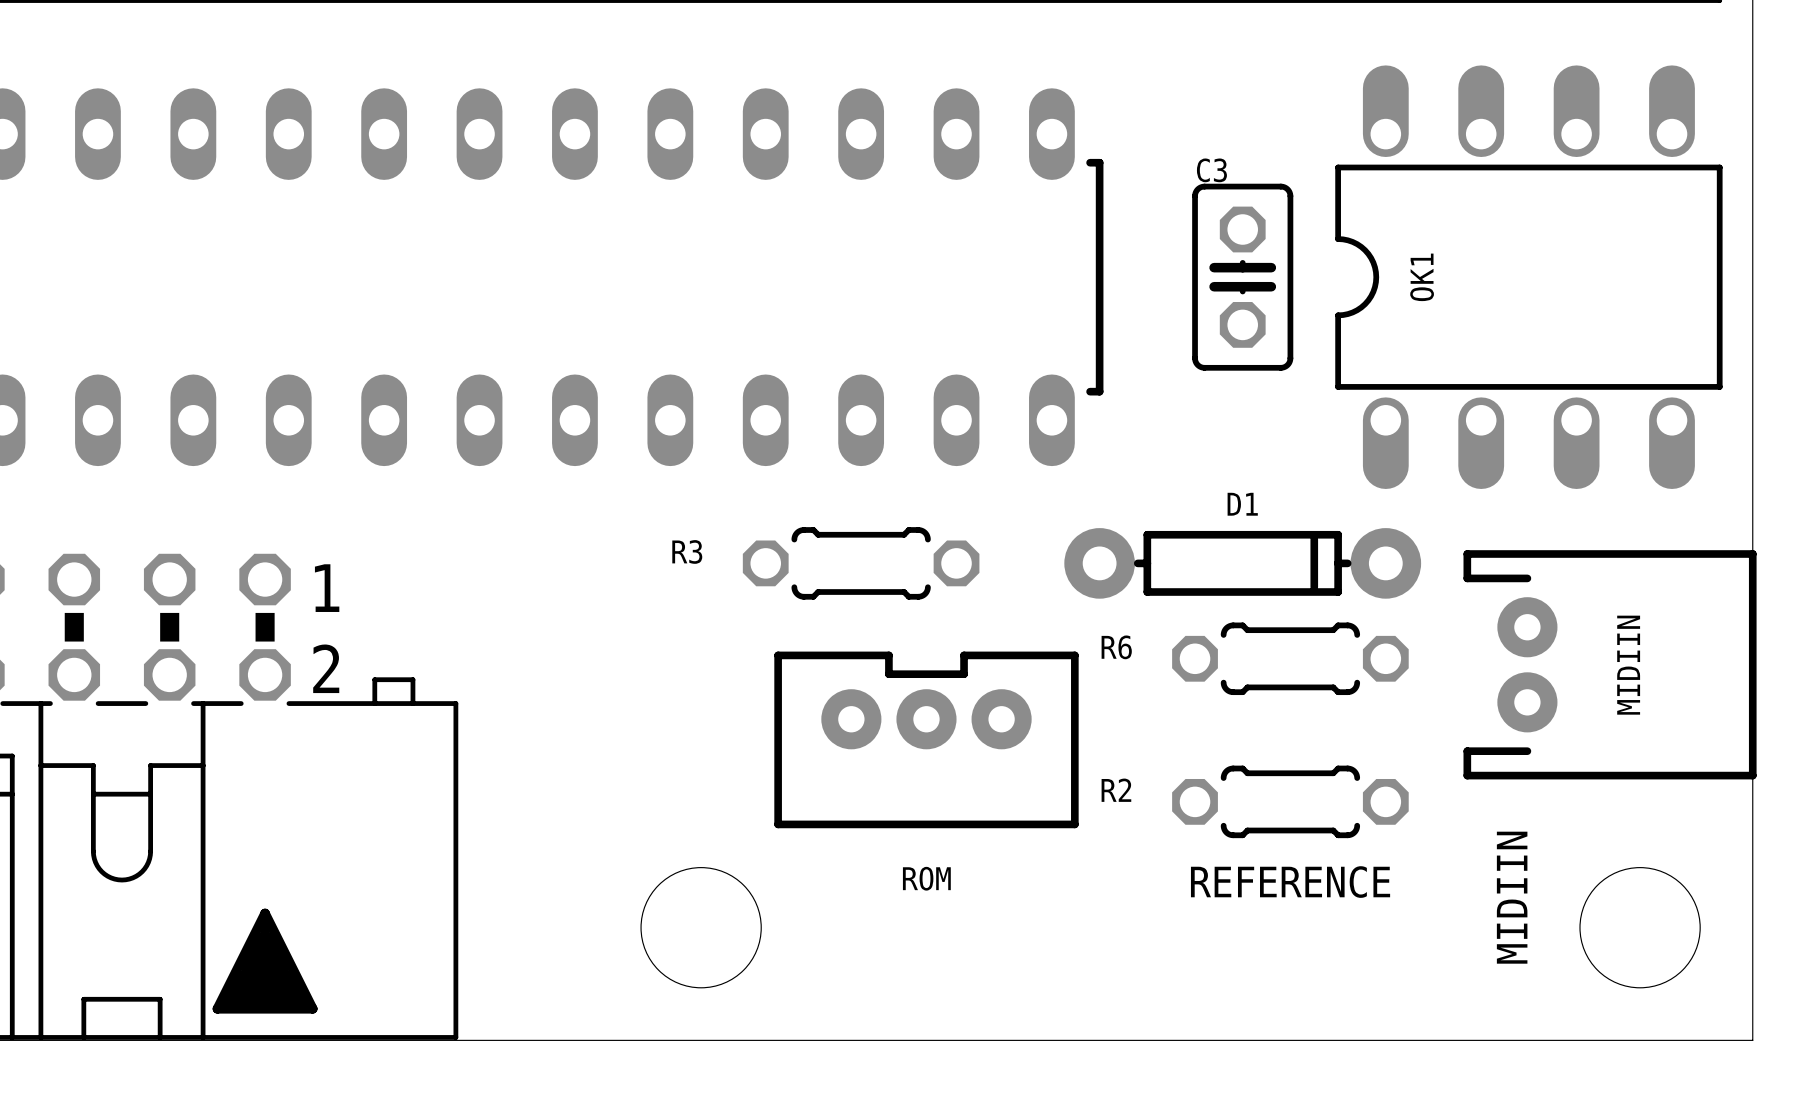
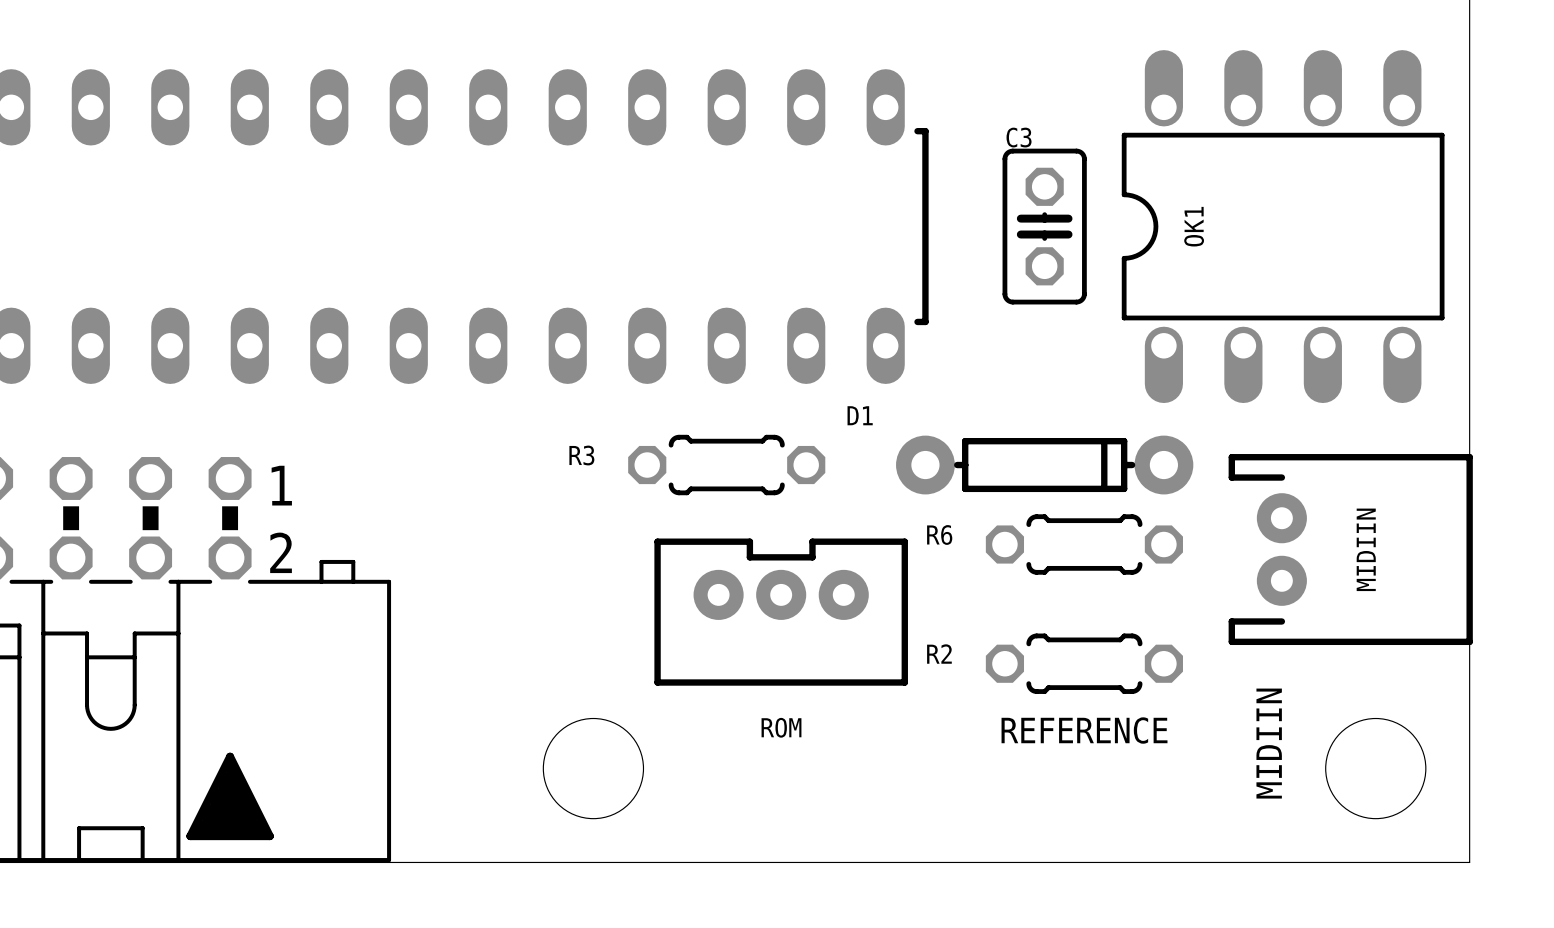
D1 name position: D1 (1242, 504) -> D1 (860, 415)

